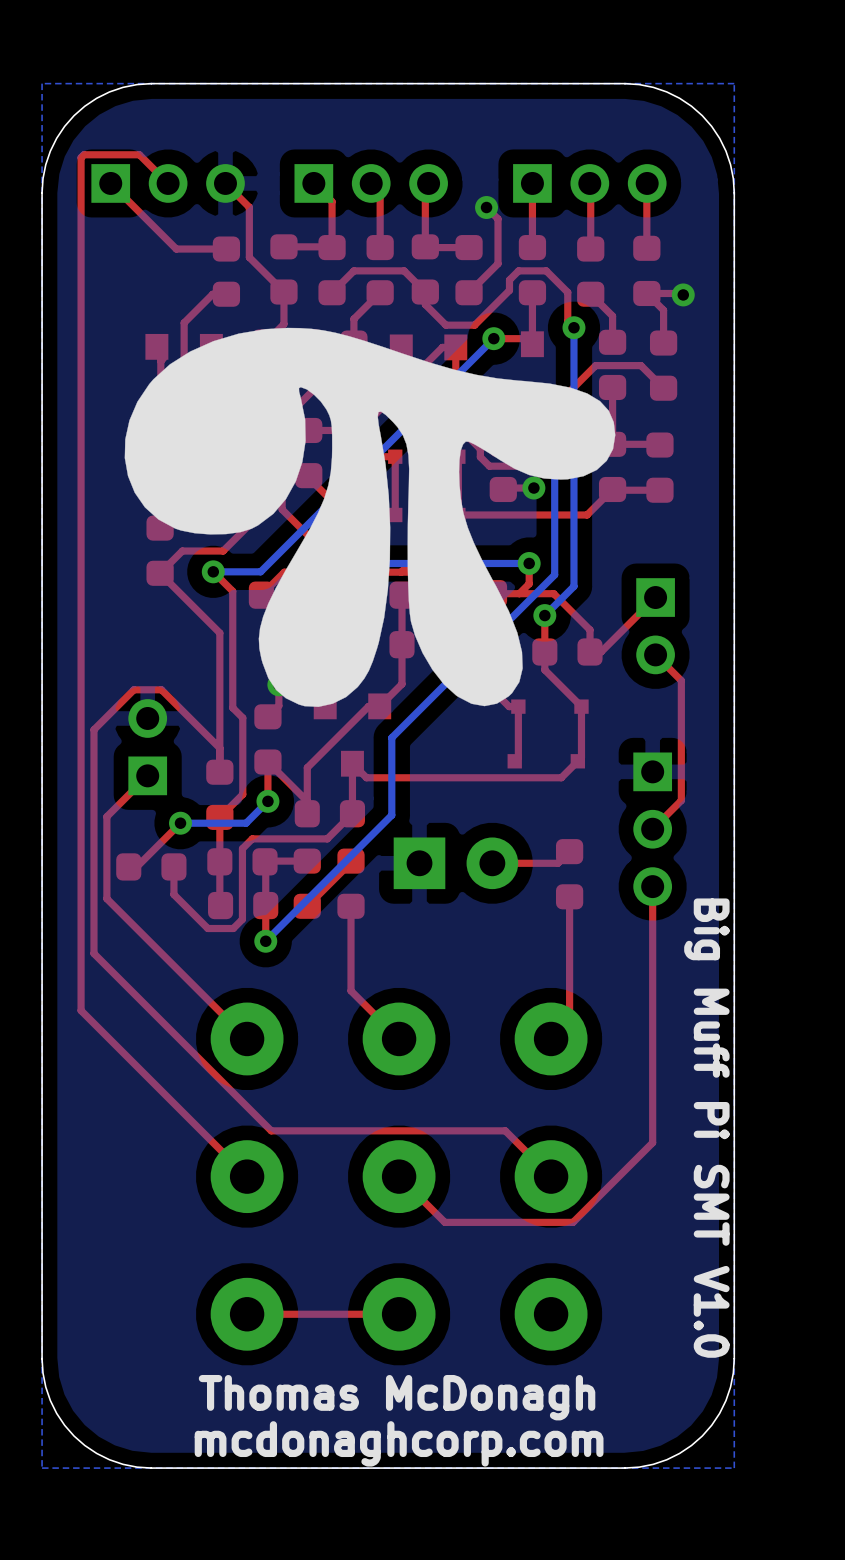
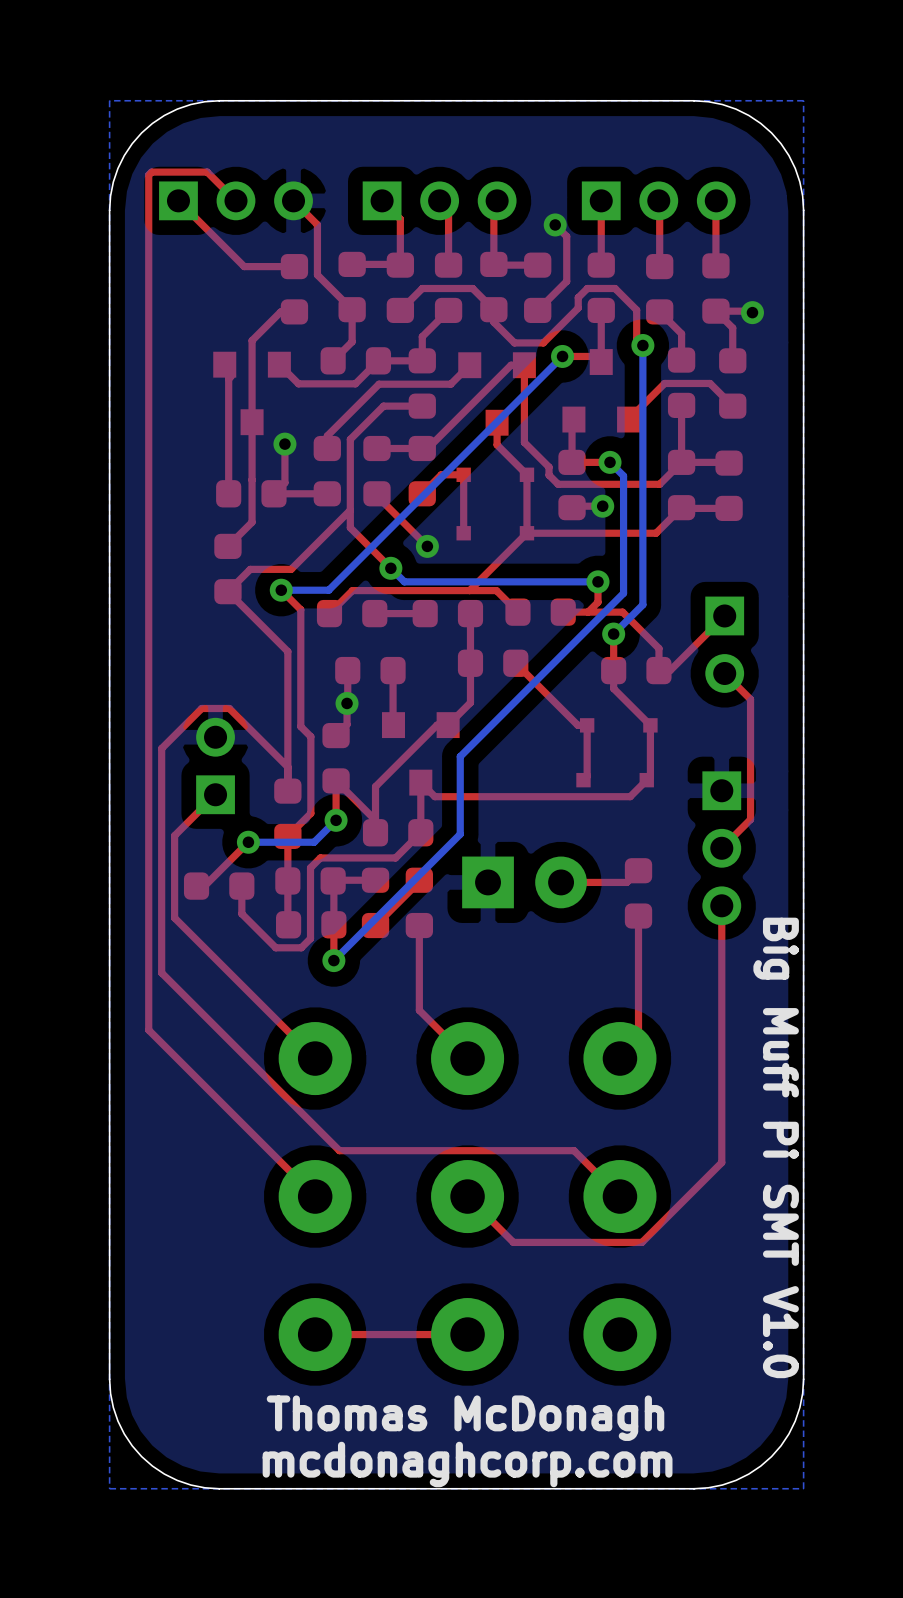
drawing: [124, 327, 616, 707] -> none

